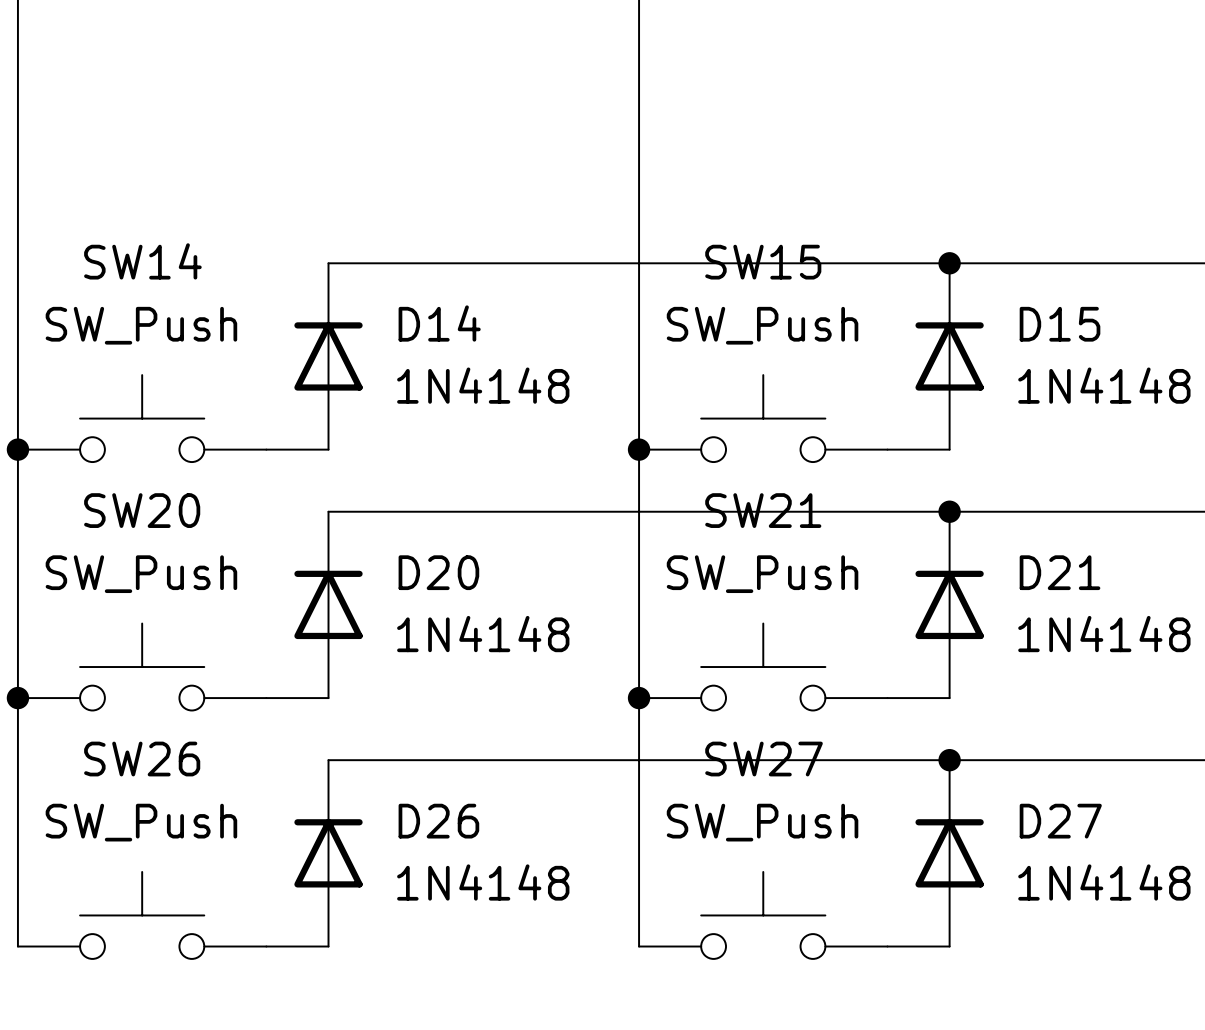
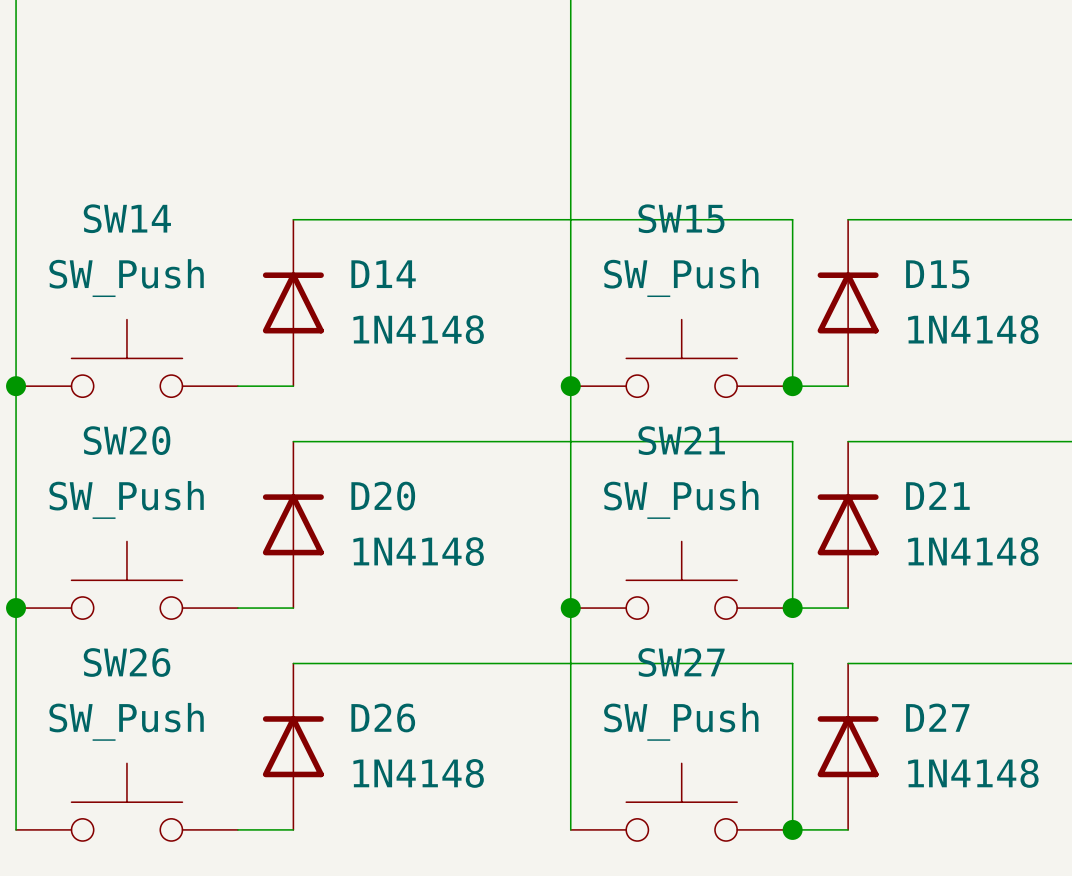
wire: (887, 263) (949, 263) -> (792, 219) (792, 386)
junction: (949, 263) -> none
wire: (887, 511) (949, 511) -> (792, 441) (792, 608)
junction position: (949, 511) -> (792, 386)
wire: (887, 760) (949, 760) -> (792, 663) (792, 829)
junction position: (949, 760) -> (792, 608)
junction: none -> (792, 829)

